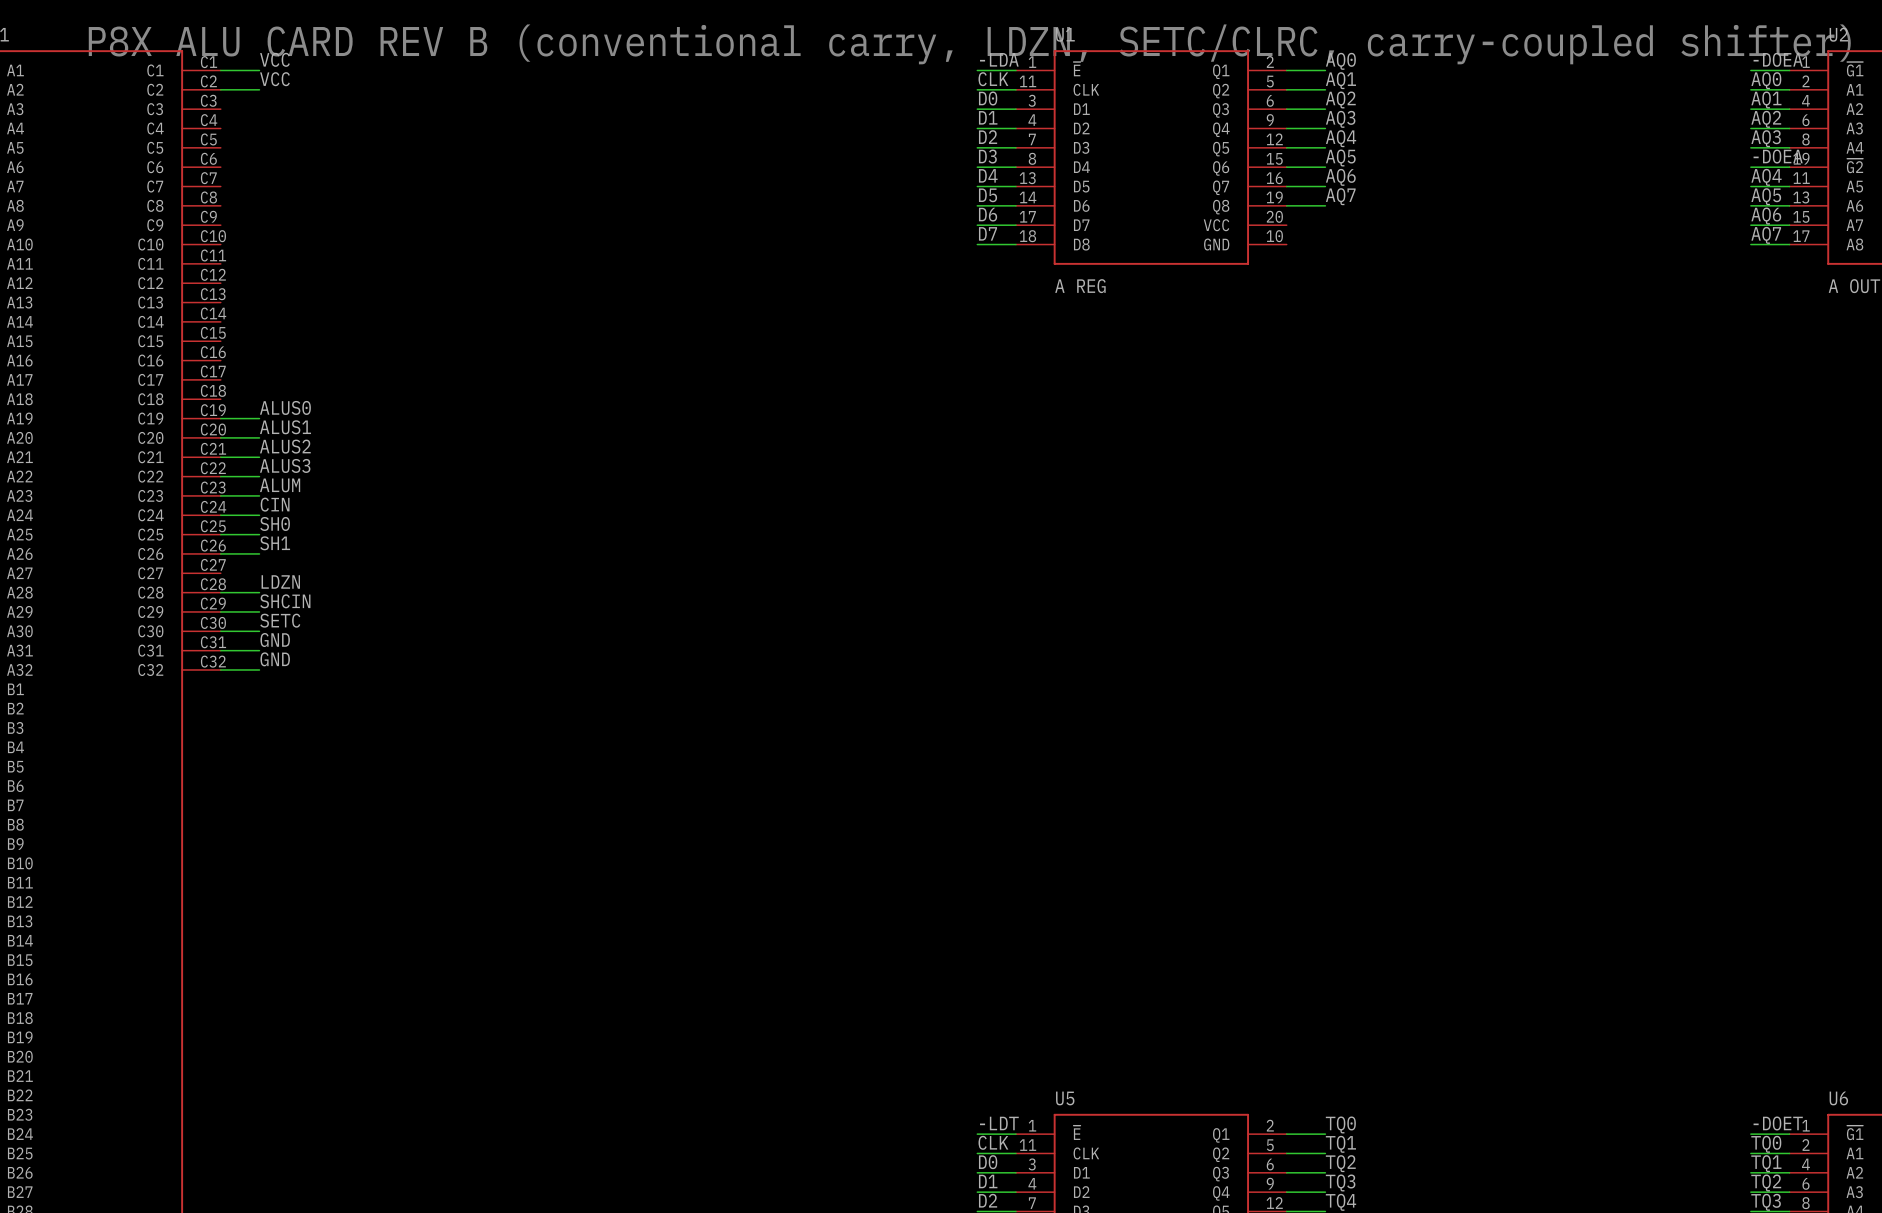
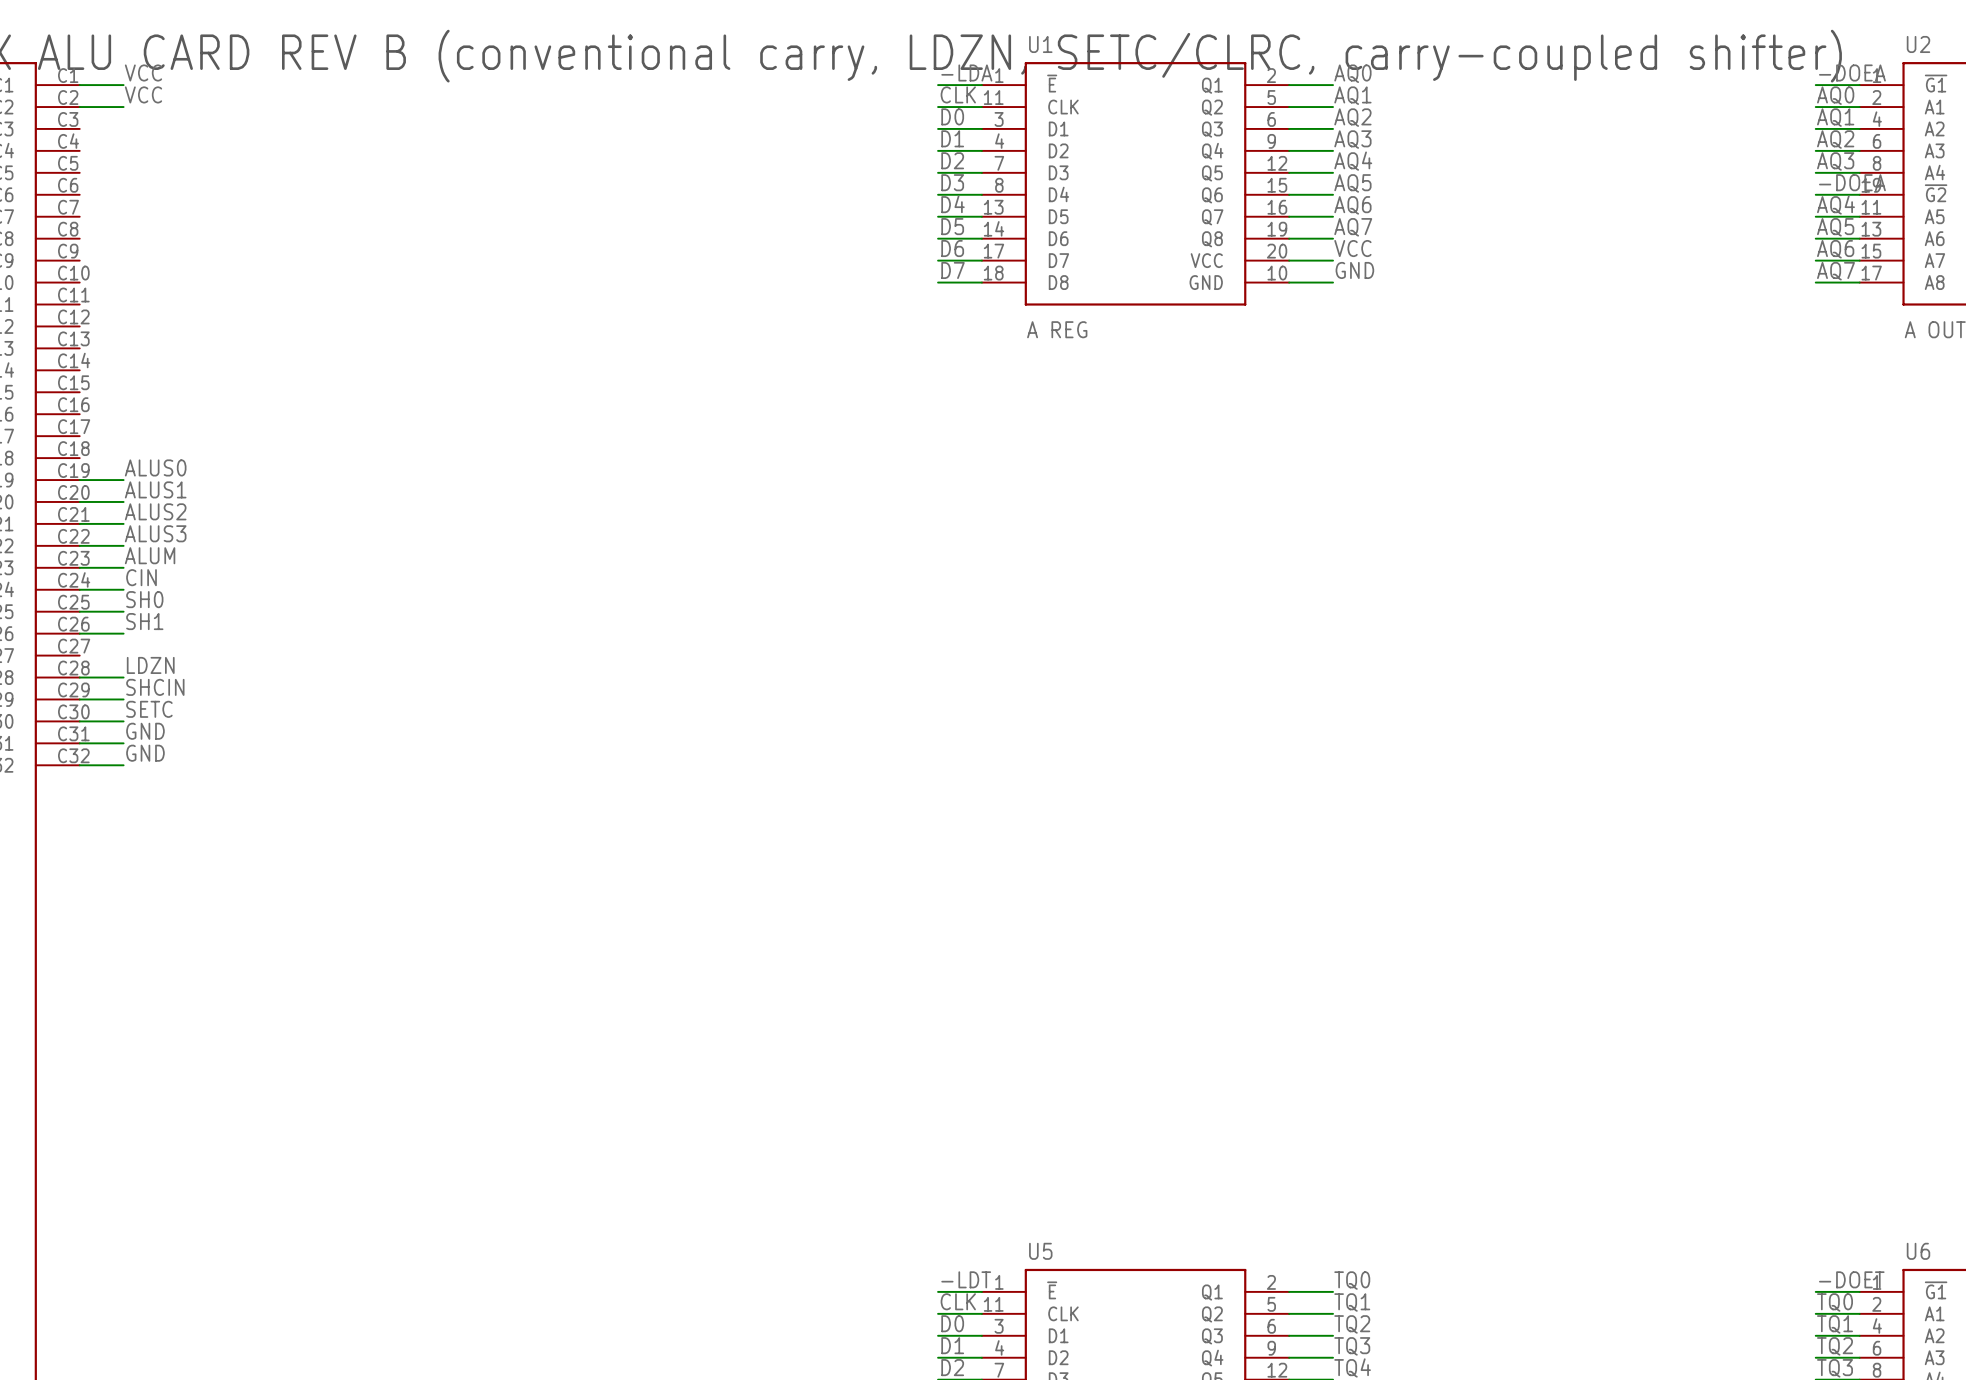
label: none -> VCC (1352, 248)
wire: none -> (1289, 260) (1333, 260)
label: none -> GND (1354, 270)
wire: none -> (1289, 282) (1333, 282)

